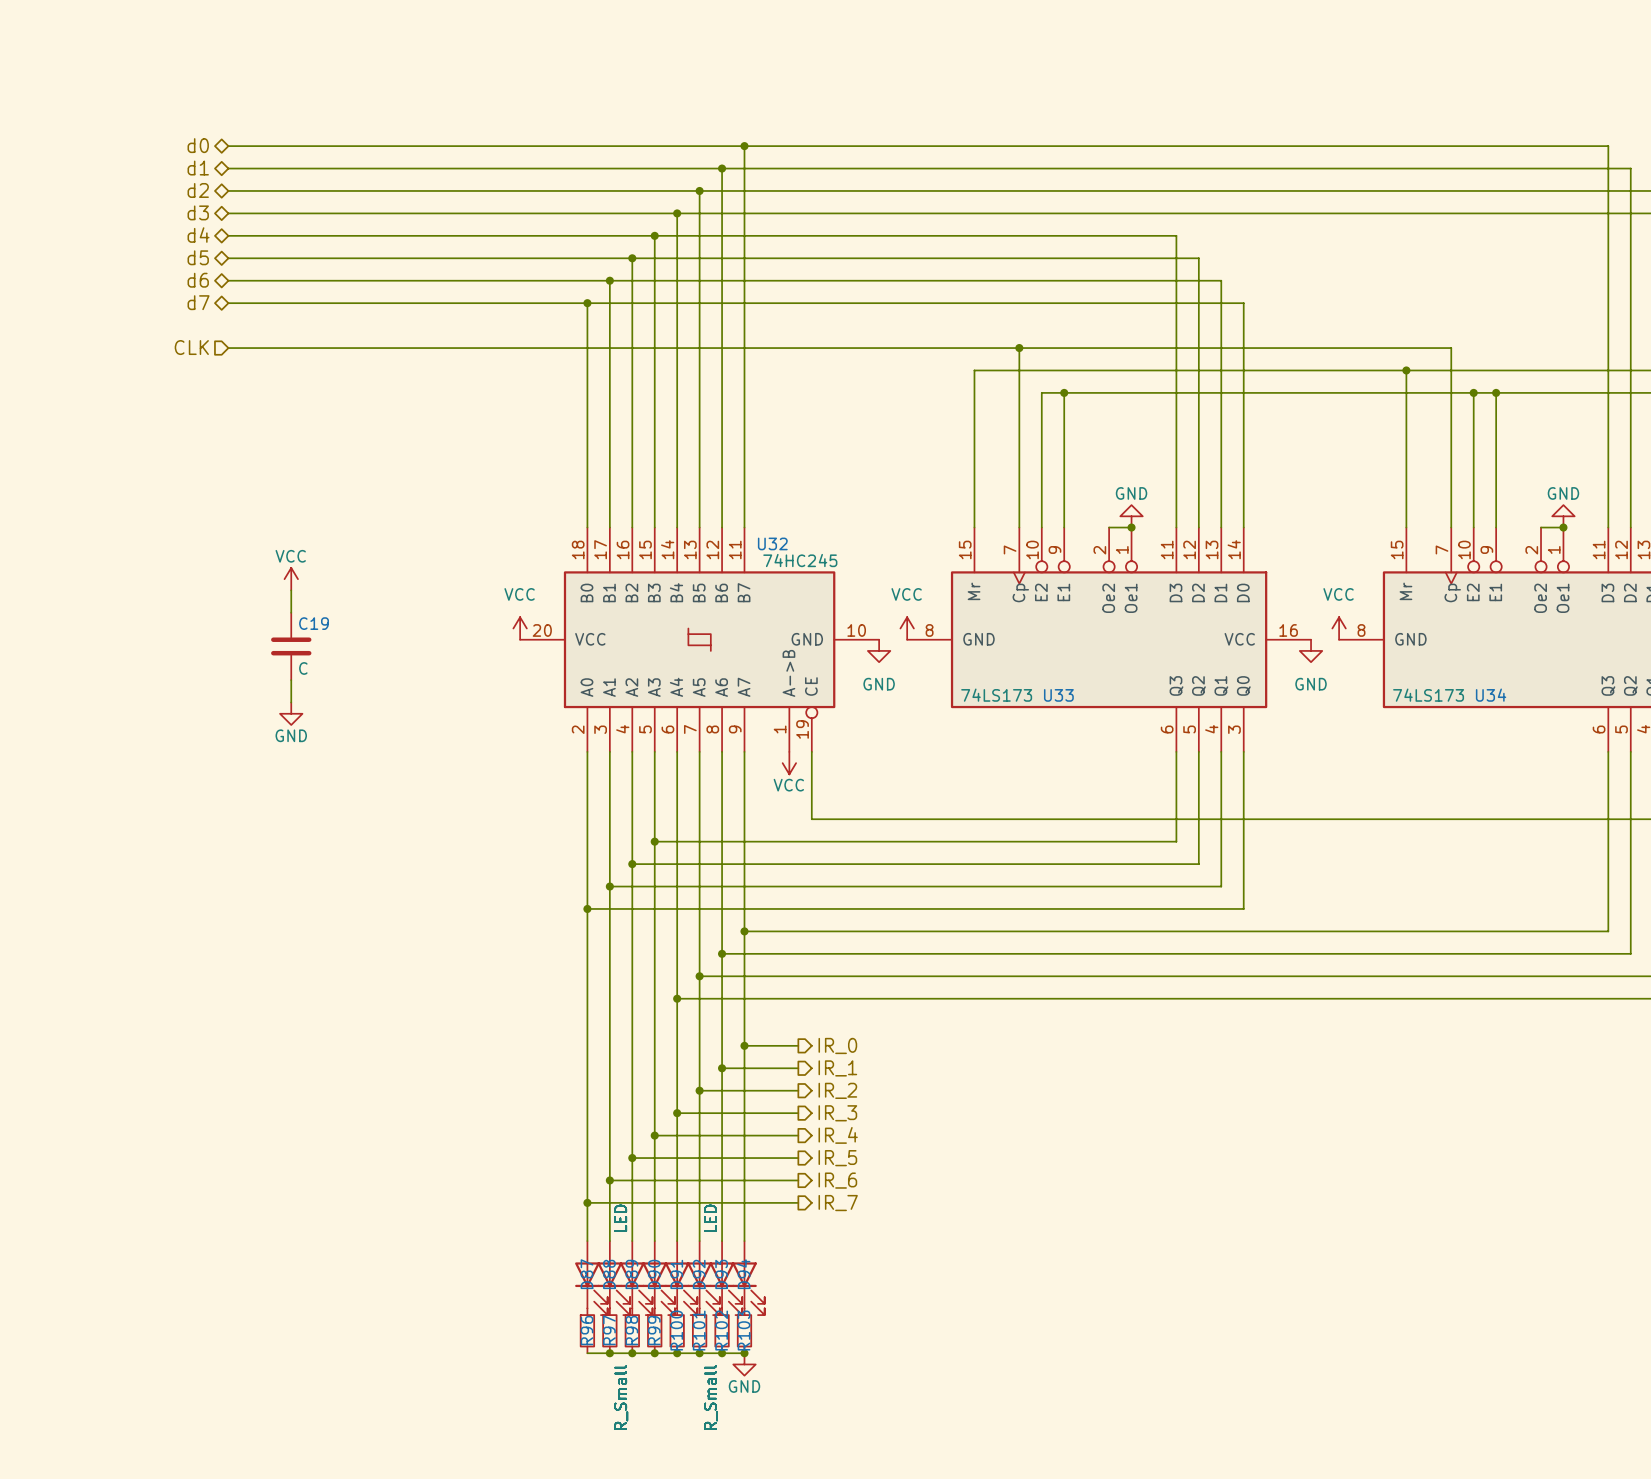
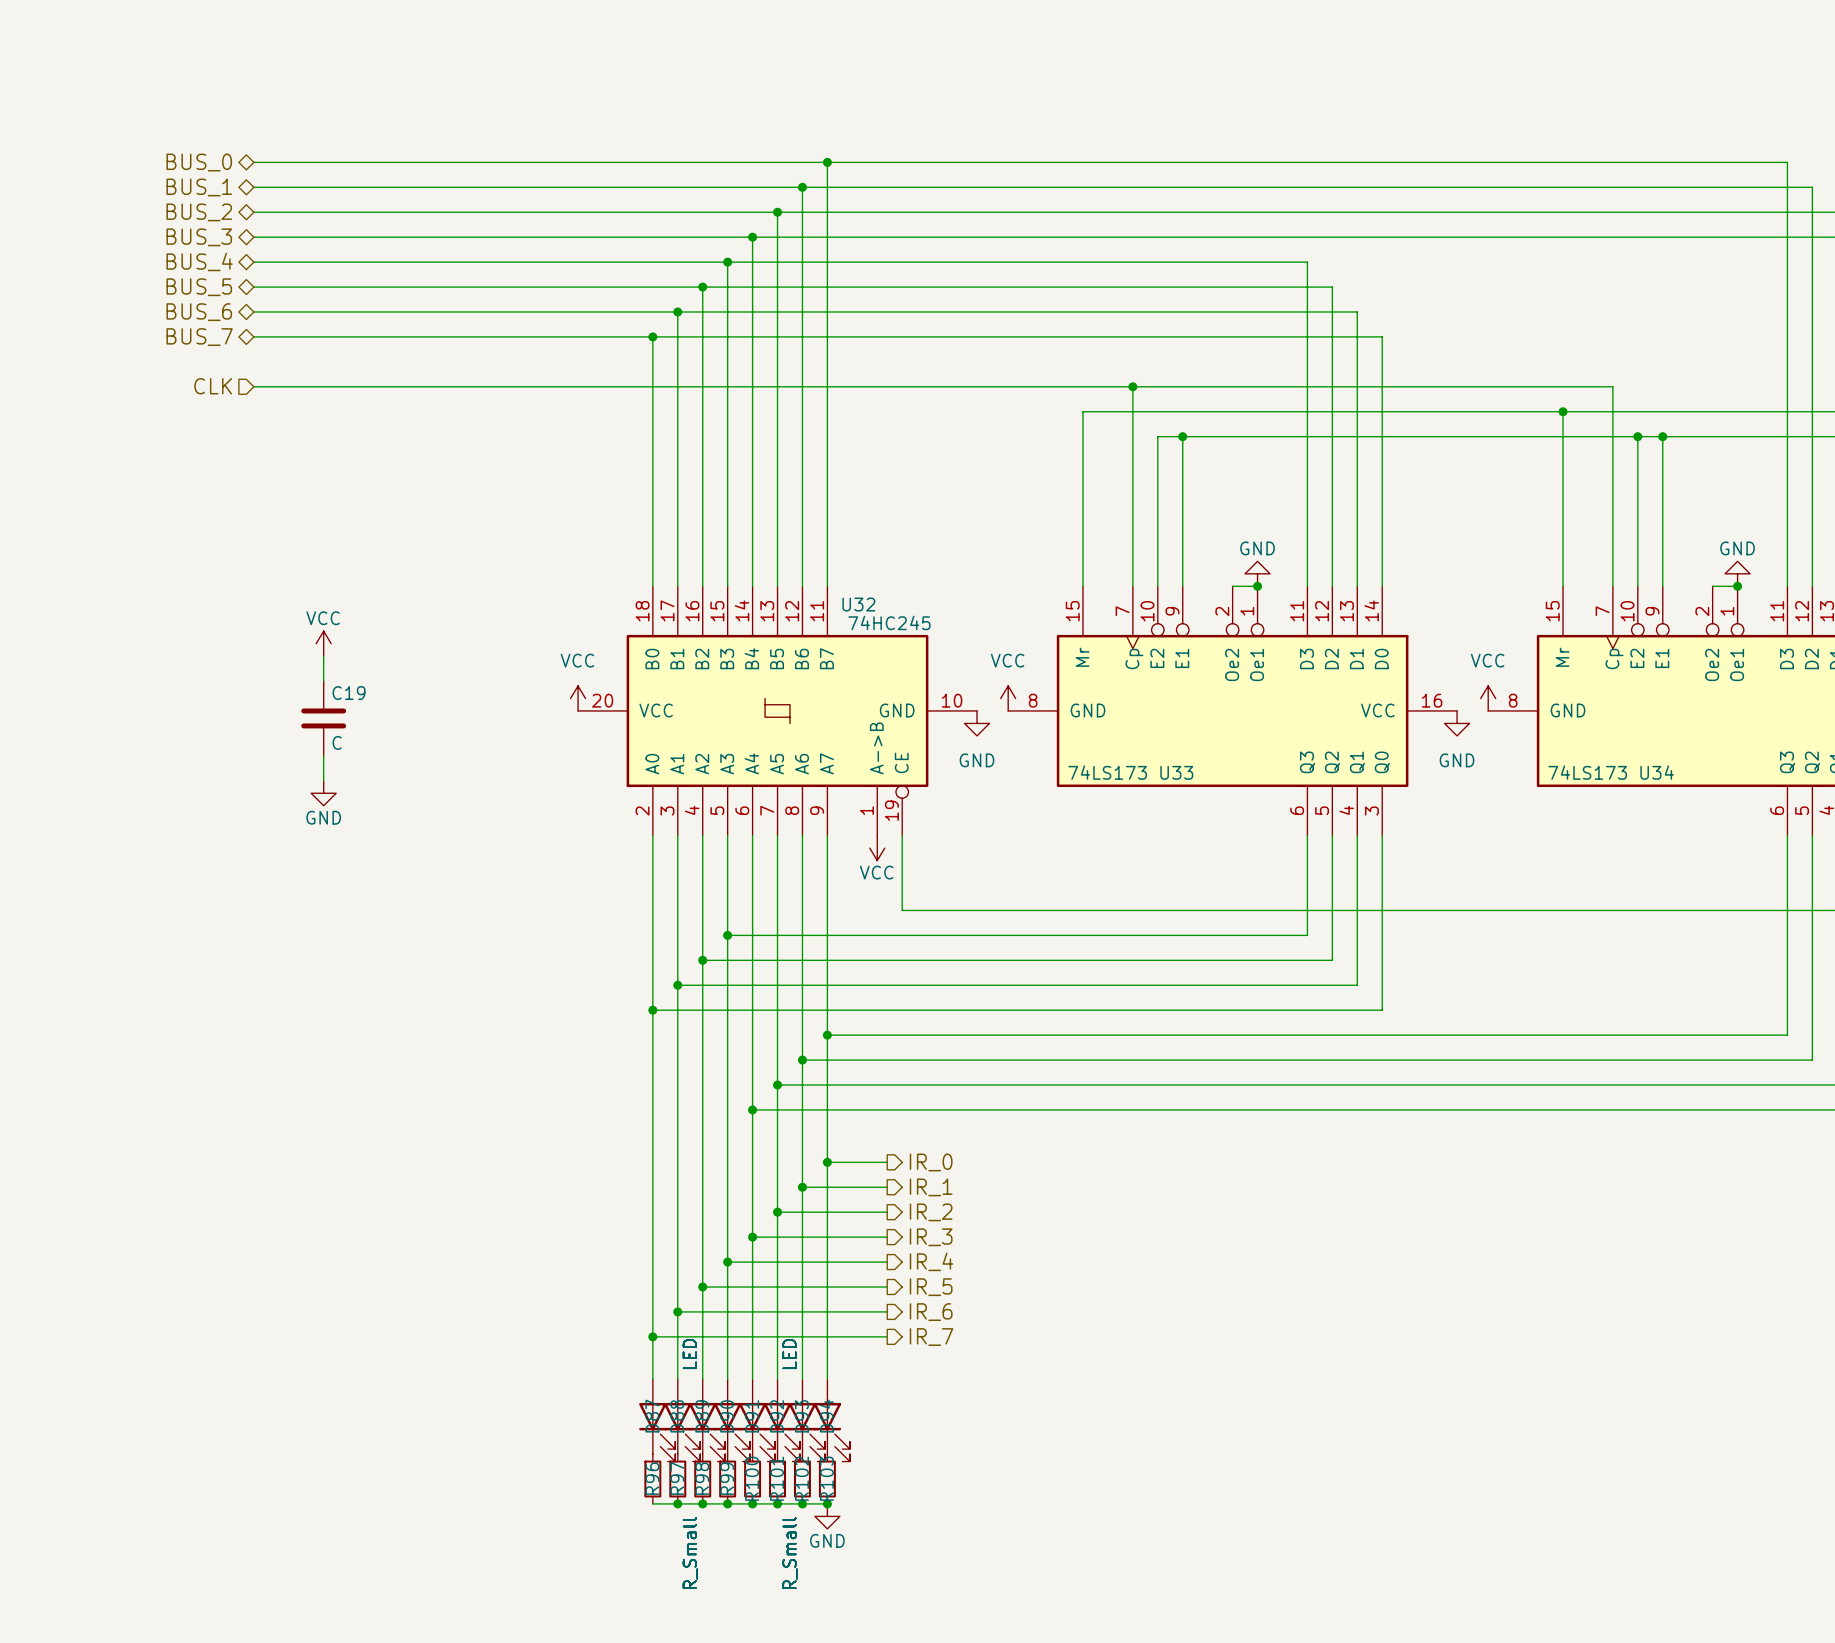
hierarchical label: d0 (198, 145) -> BUS_0 (199, 162)
hierarchical label: d1 (198, 168) -> BUS_1 (199, 187)
hierarchical label: d2 (198, 190) -> BUS_2 (199, 212)
hierarchical label: d3 (198, 212) -> BUS_3 (199, 237)
hierarchical label: d4 (198, 235) -> BUS_4 (199, 261)
hierarchical label: d5 (198, 257) -> BUS_5 (199, 287)
hierarchical label: d6 (198, 280) -> BUS_6 (199, 312)
hierarchical label: d7 (198, 302) -> BUS_7 (199, 337)

